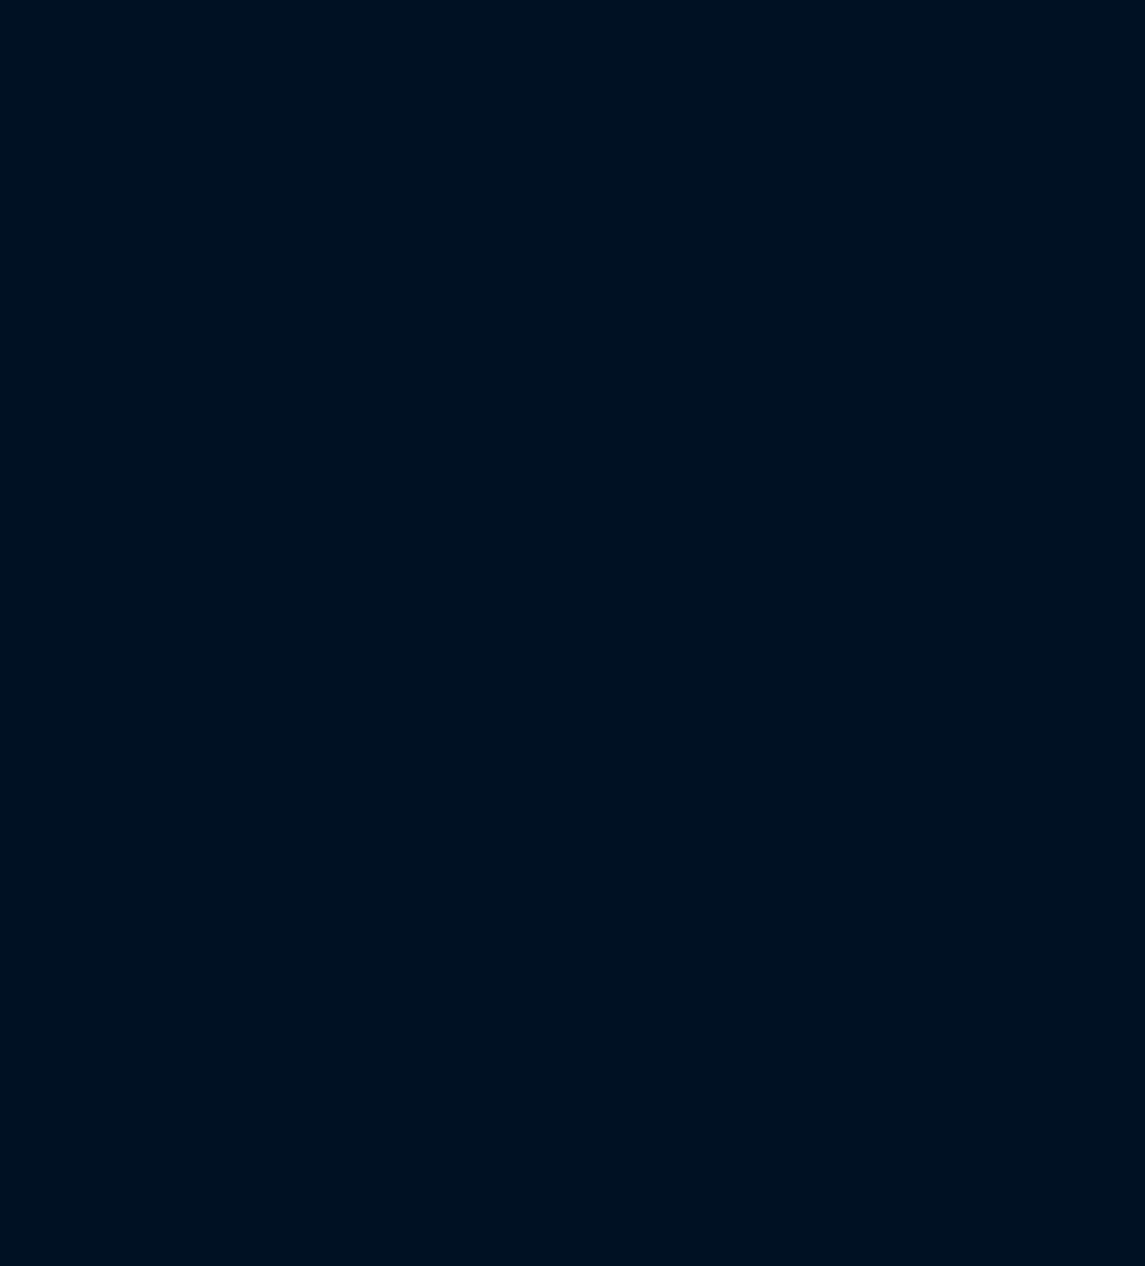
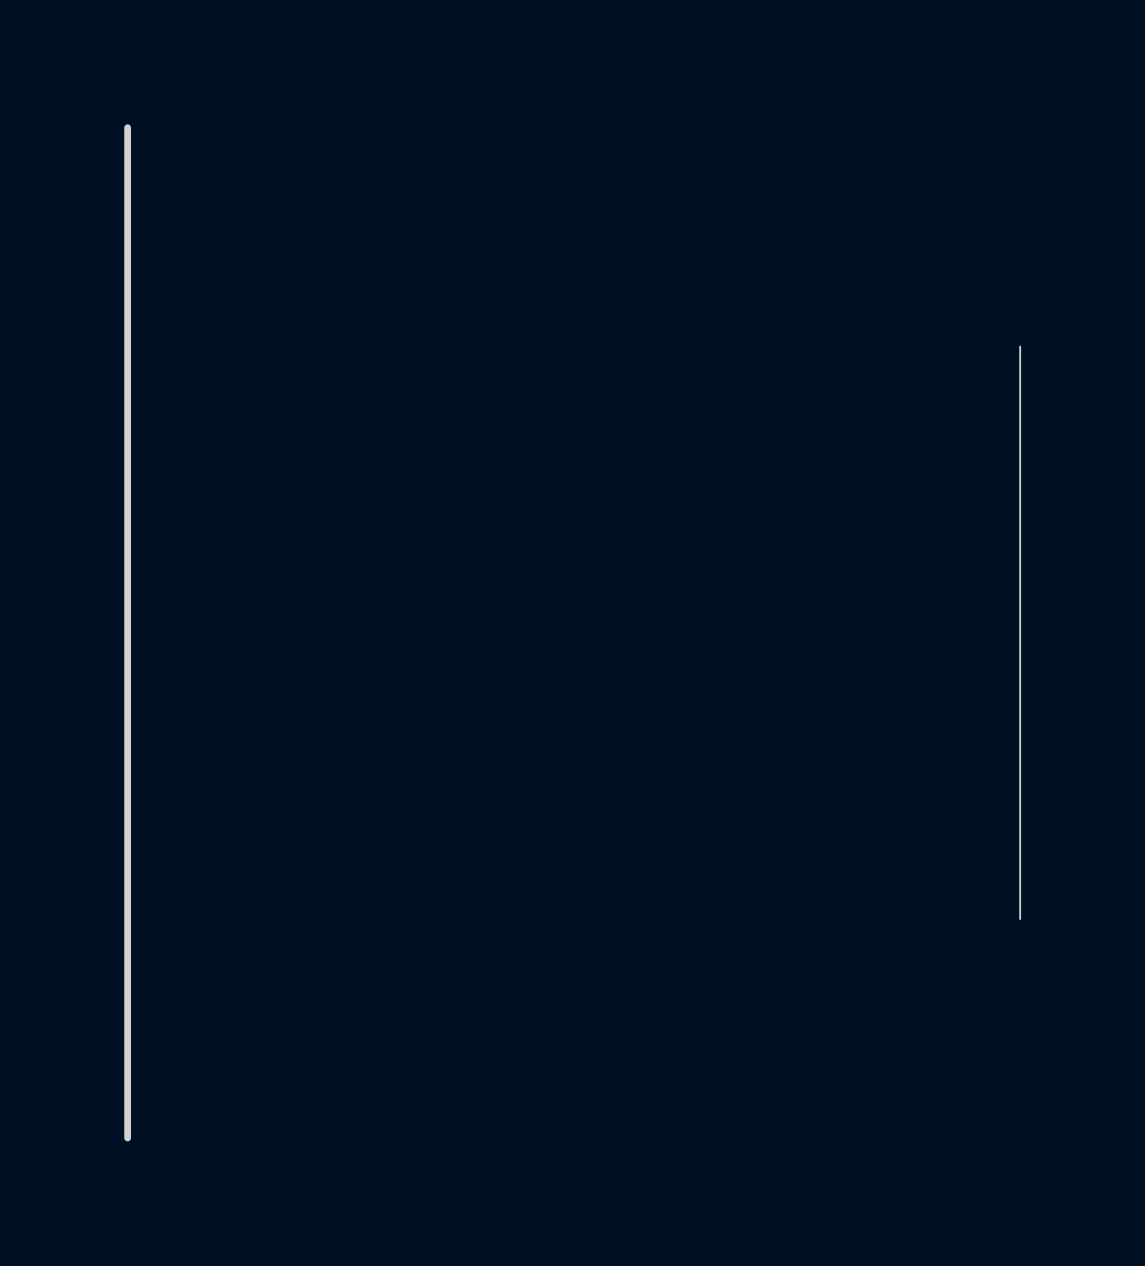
board edge: none -> (127, 127) (127, 1138)
board edge: none -> (1020, 346) (1020, 919)

